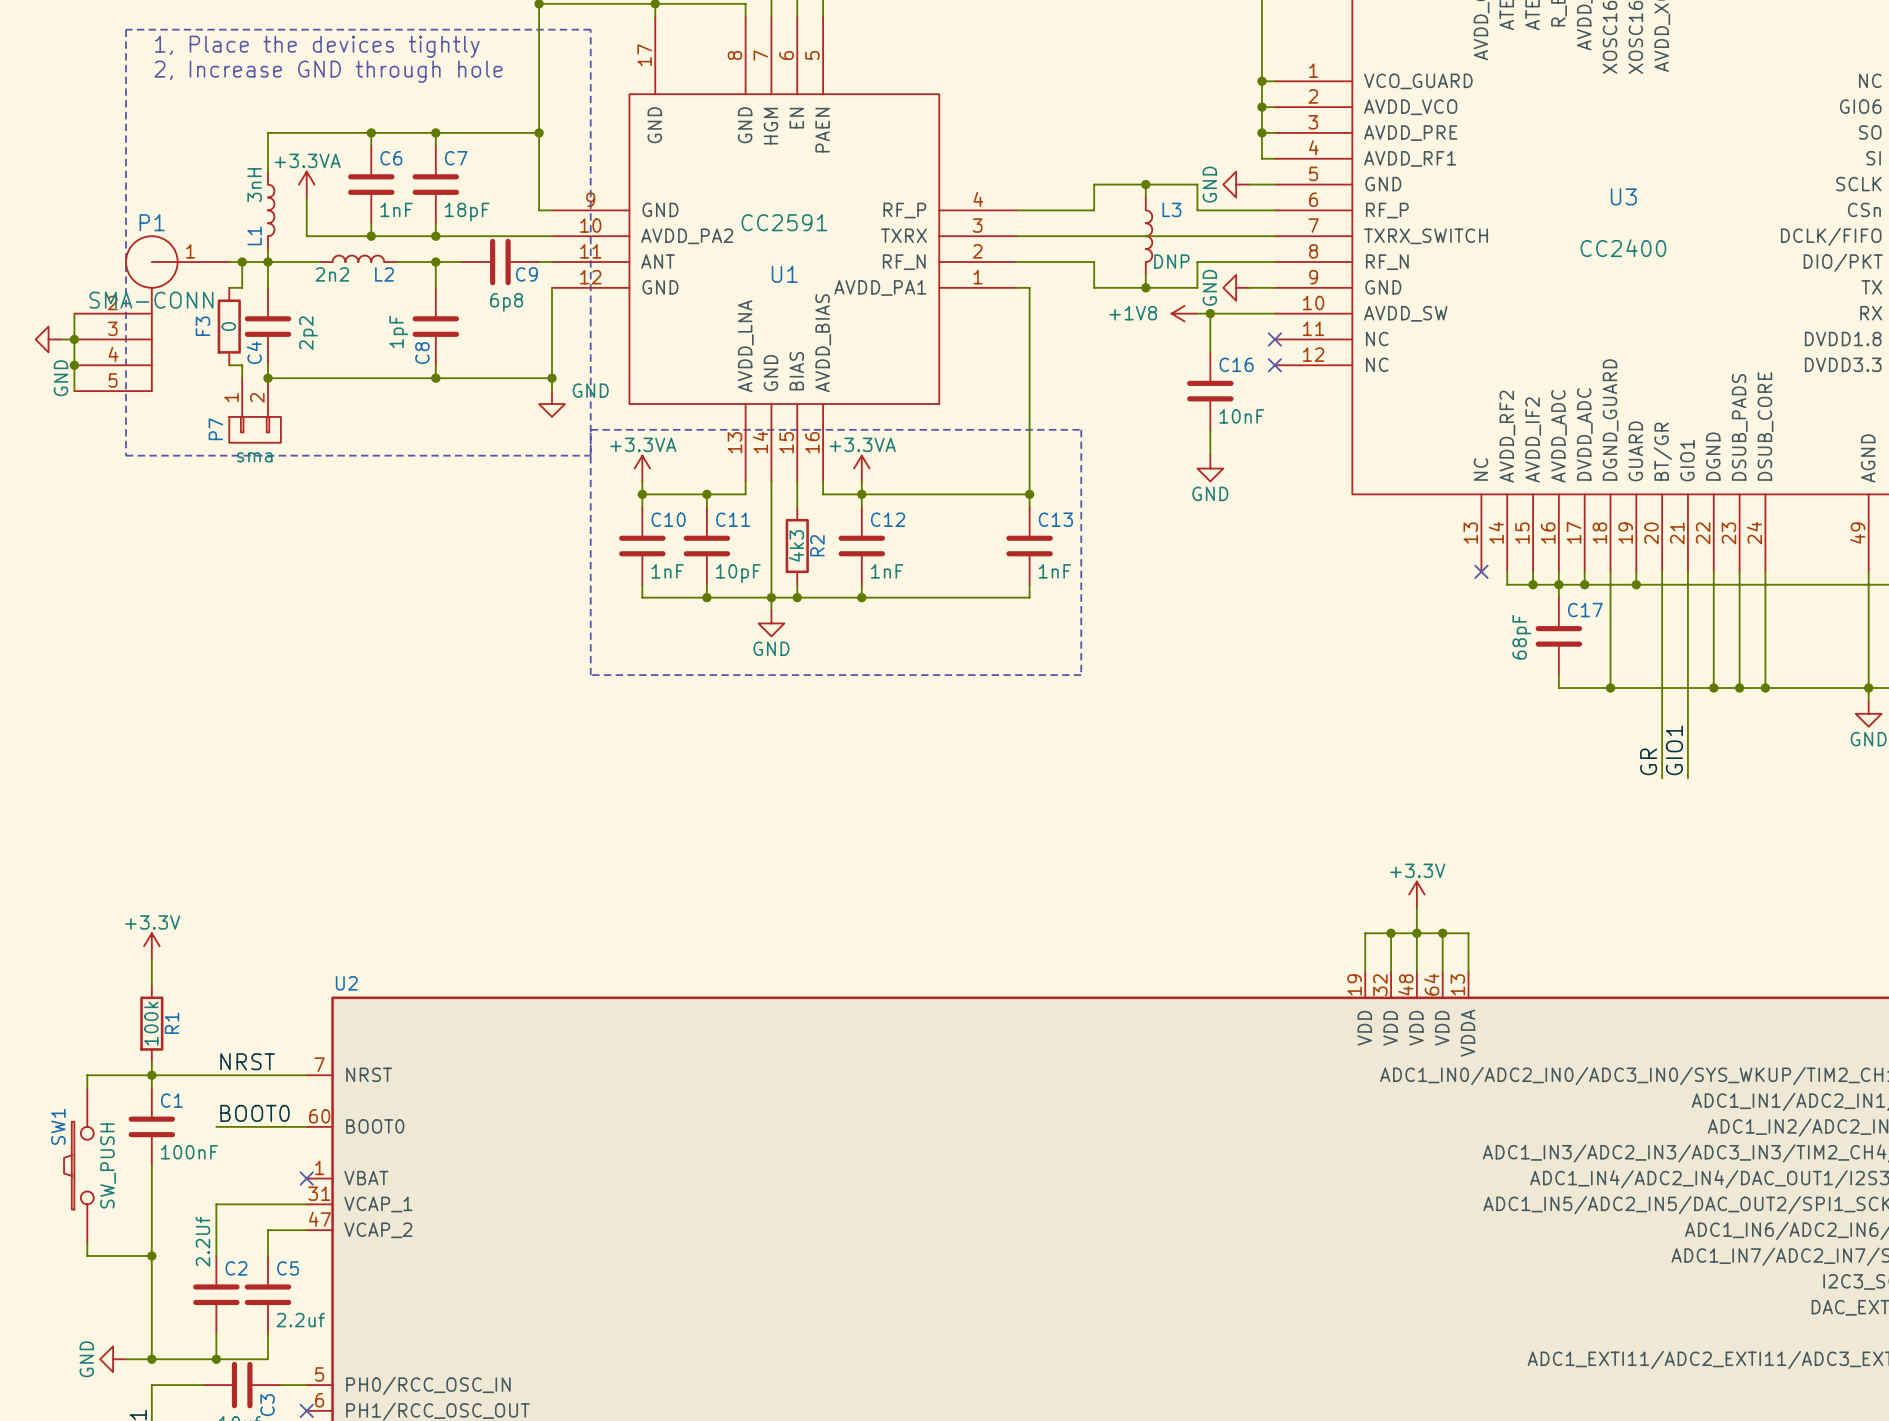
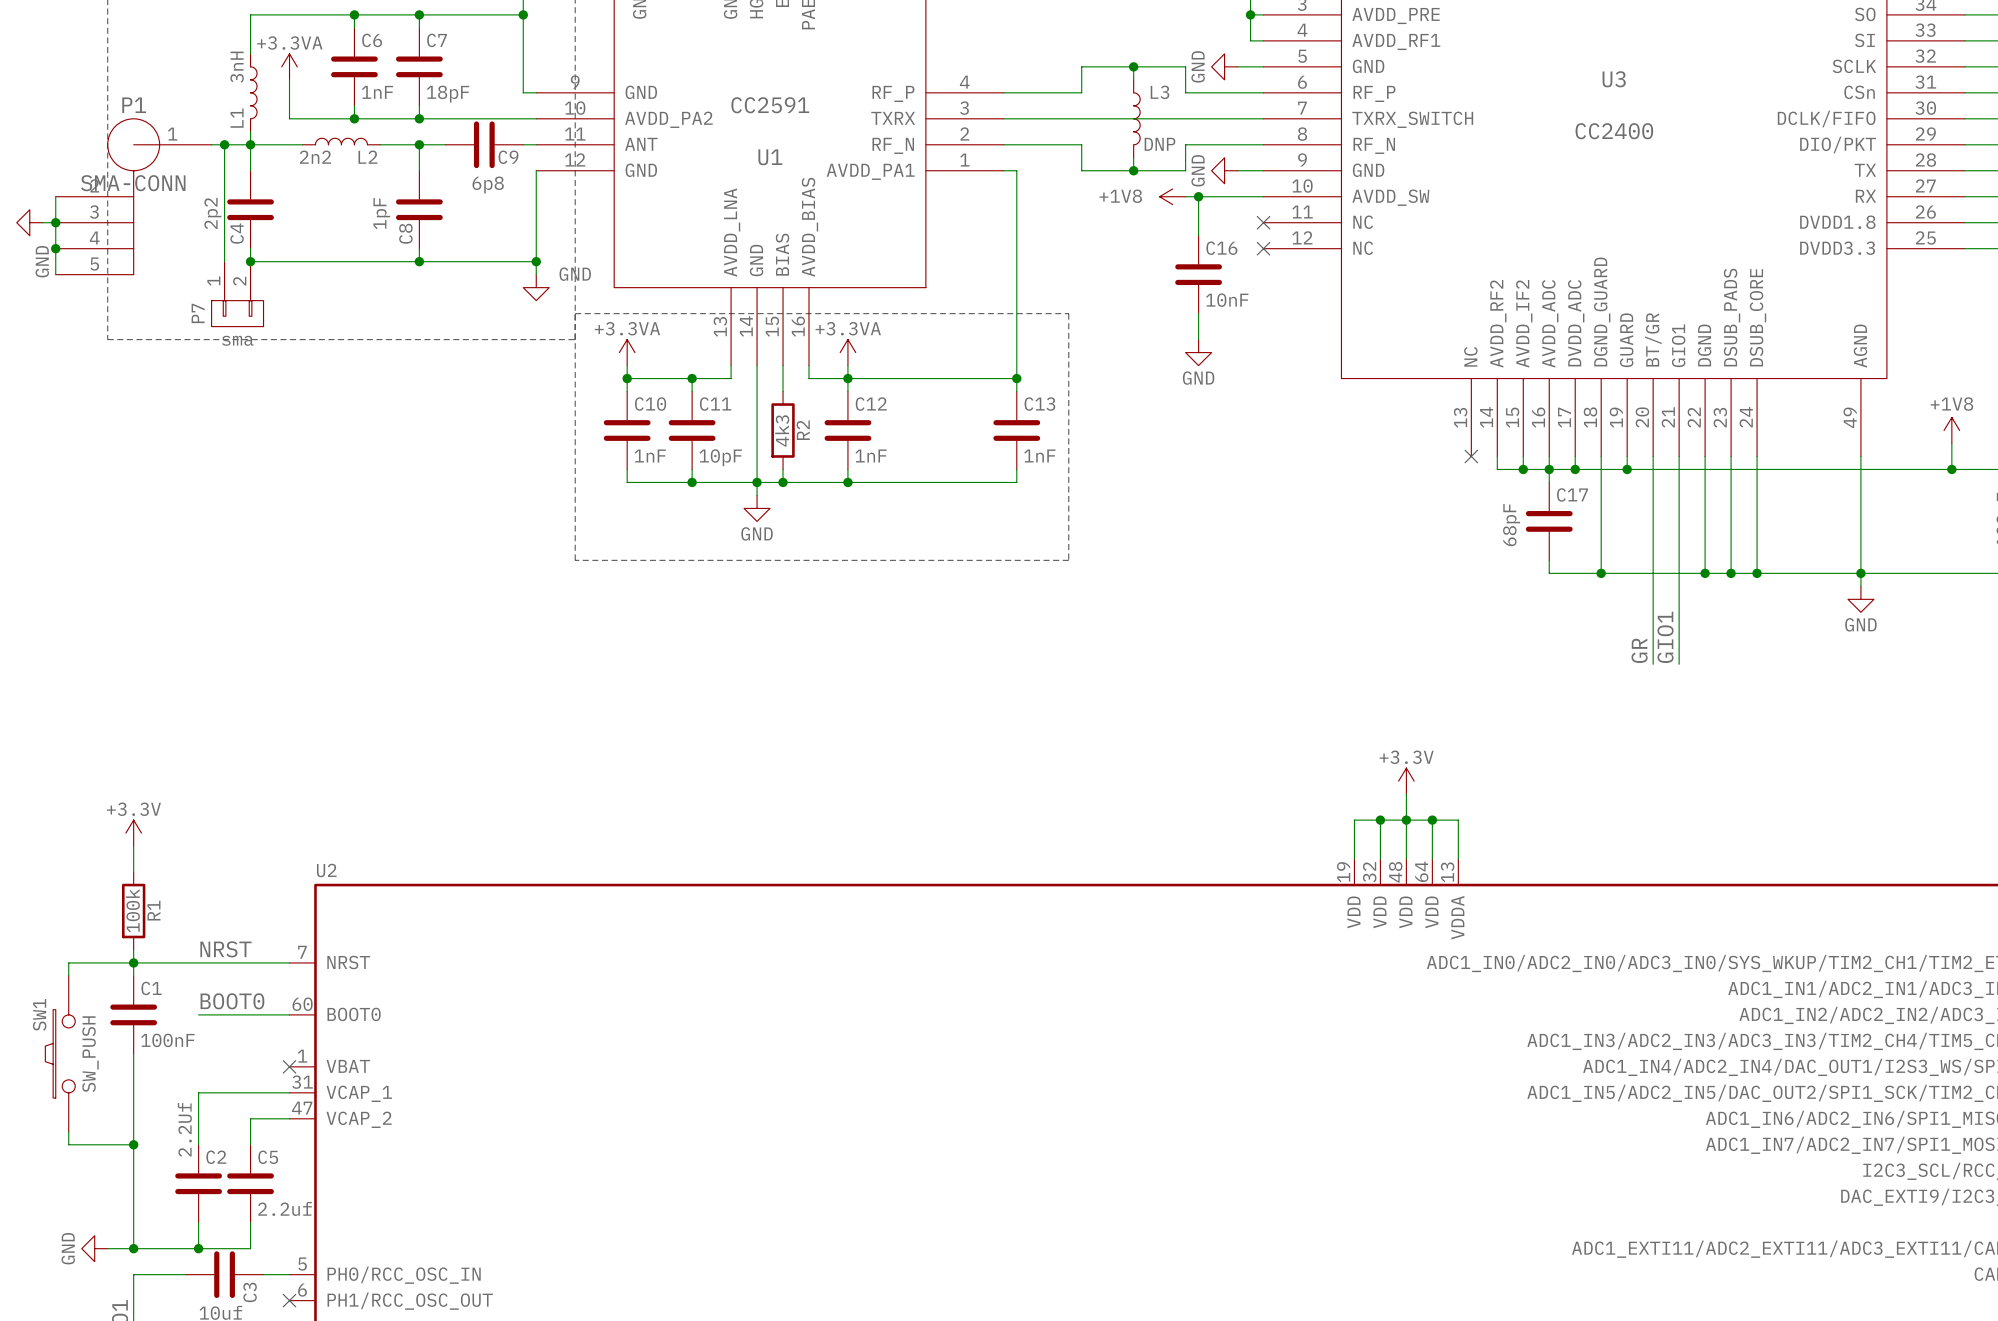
wire: (229, 287) (242, 287) -> (224, 248) (224, 170)
F3: 0 (229, 326) -> none
C4 value position: 2p2 (308, 333) -> 2p2 (212, 213)
wire: (229, 365) (242, 365) -> none

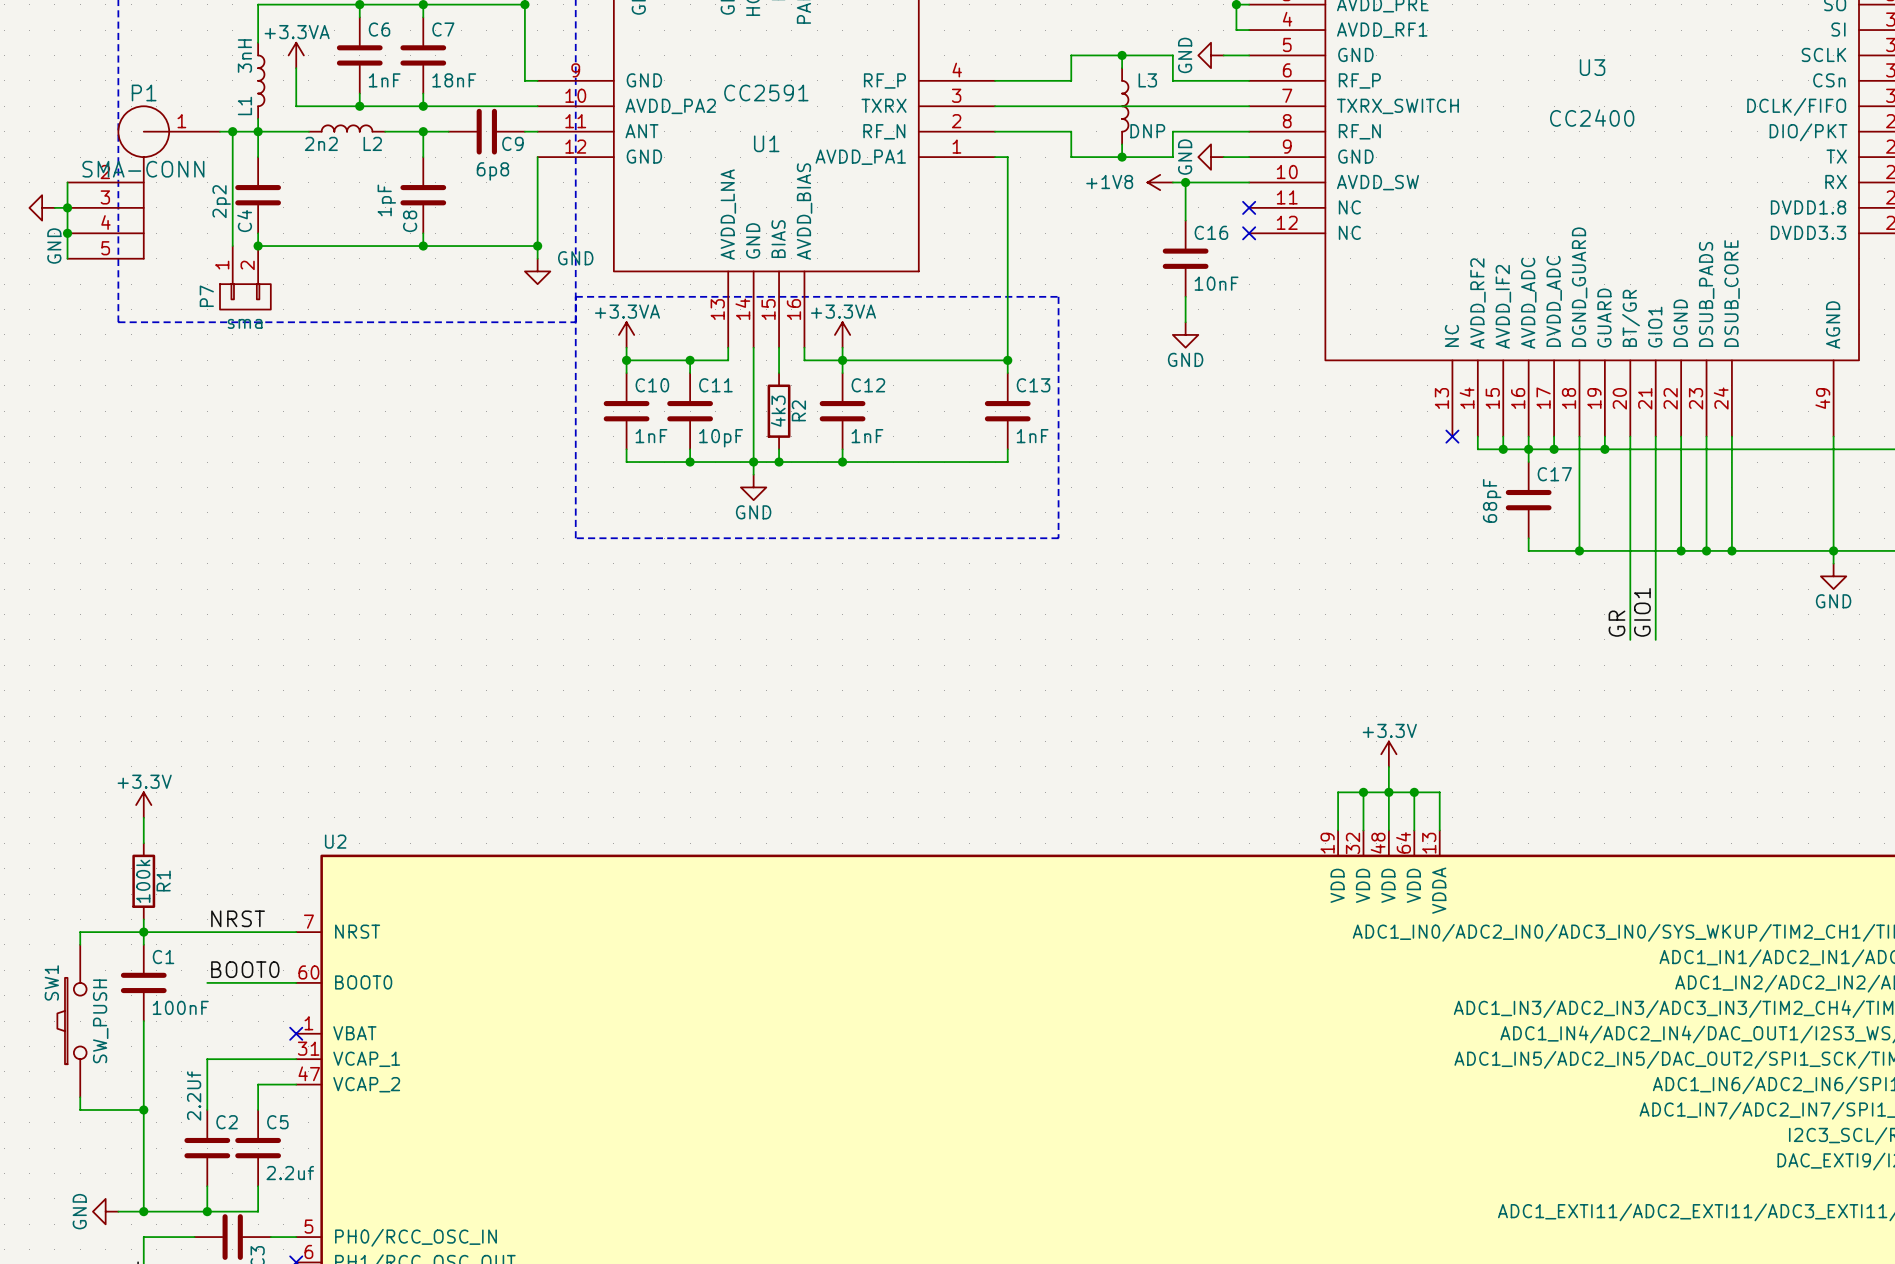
C7 value: 18pF (448, 94) -> 18nF (454, 80)

